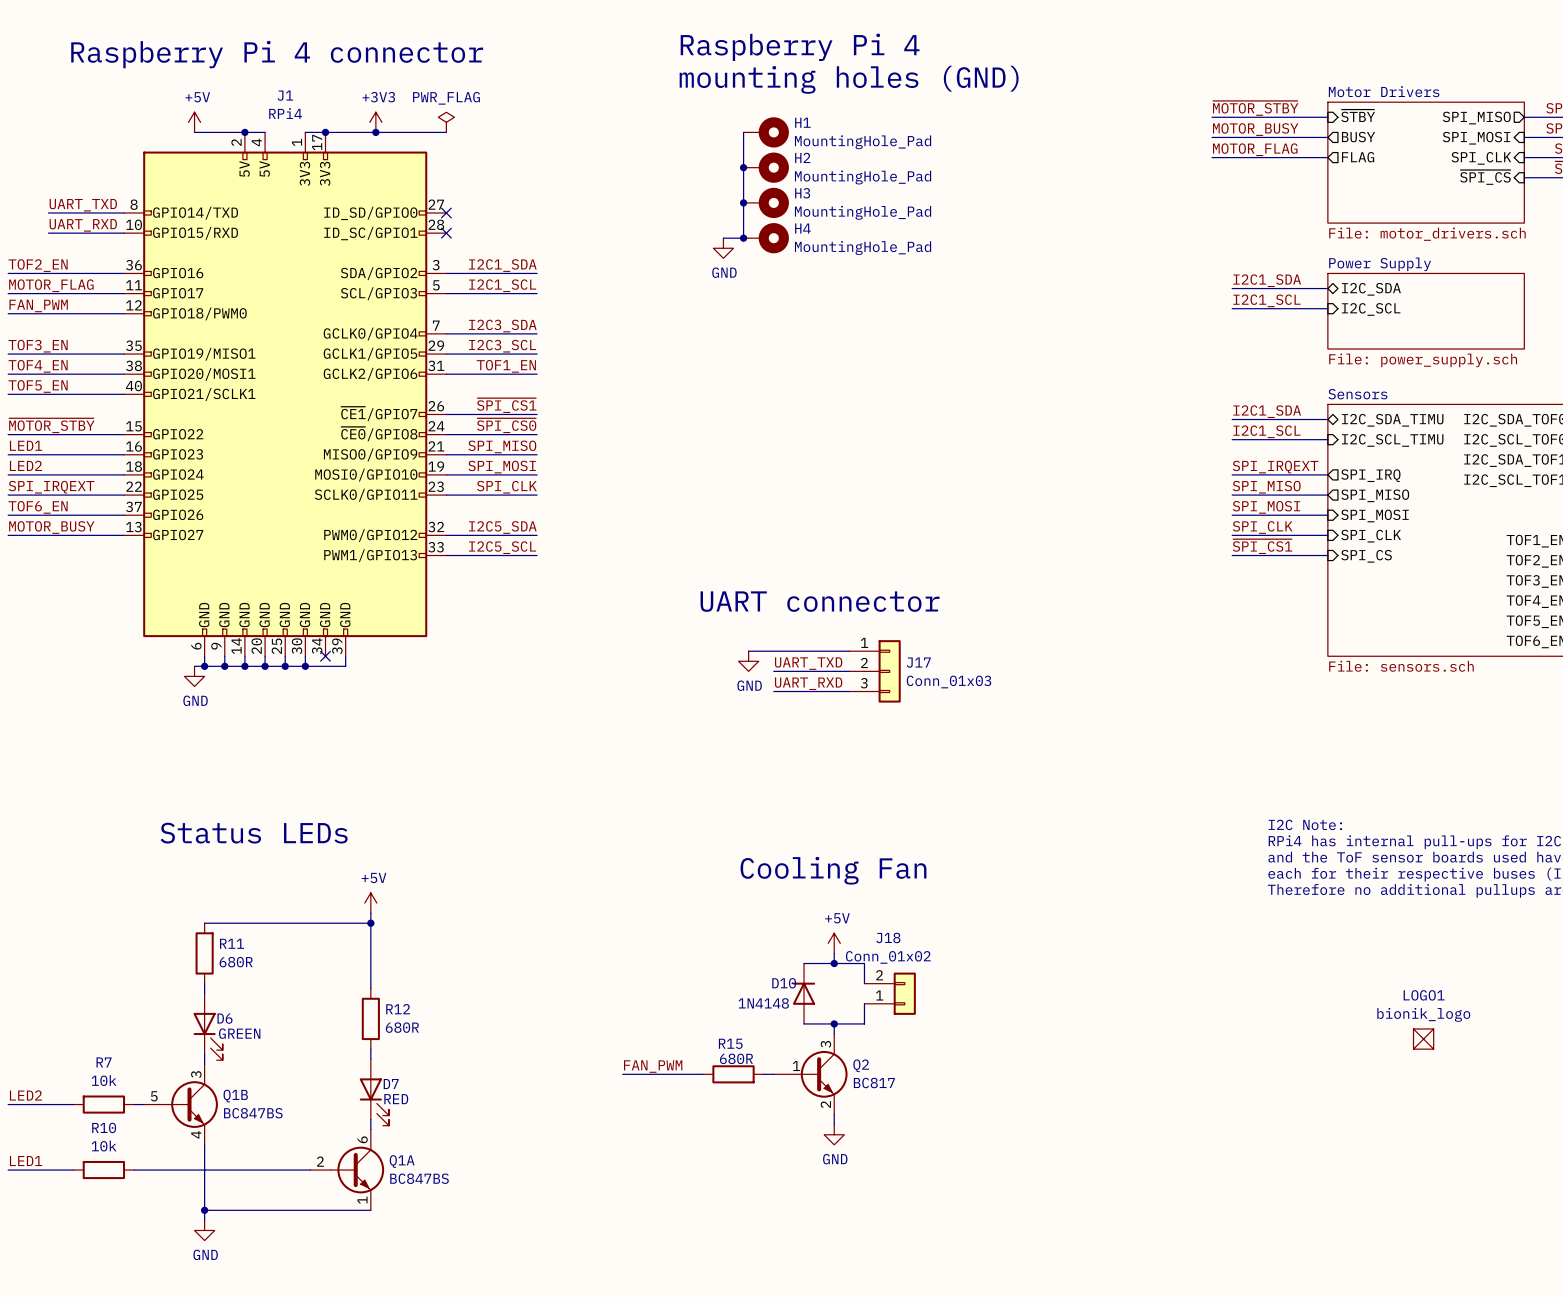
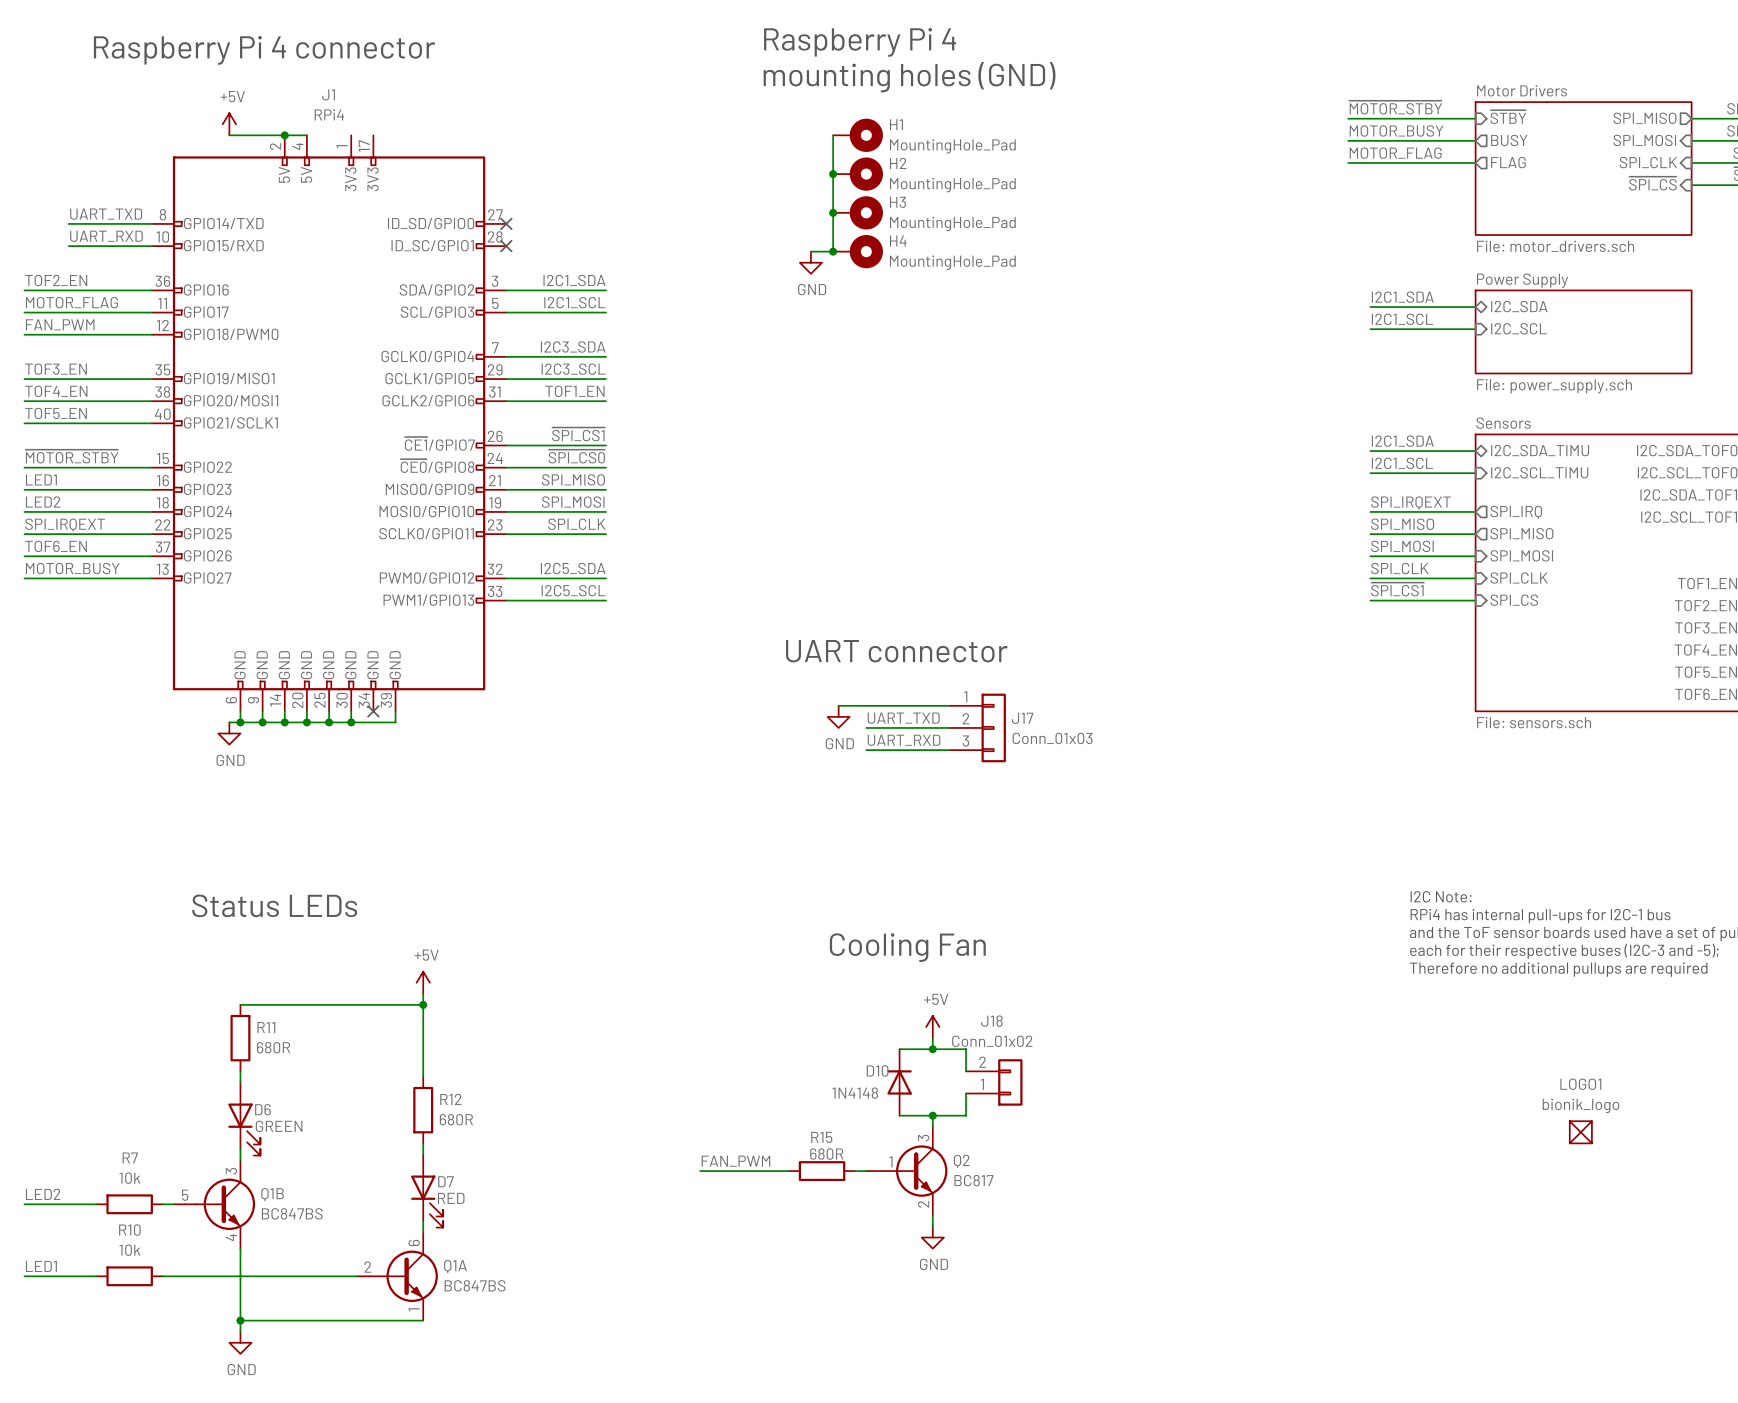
power symbol: +3V3 (375, 122) -> none
power symbol: PWR_FLAG (446, 122) -> none
wire: (305, 132) (446, 132) -> none
junction: (325, 132) -> none
junction: (375, 132) -> none

